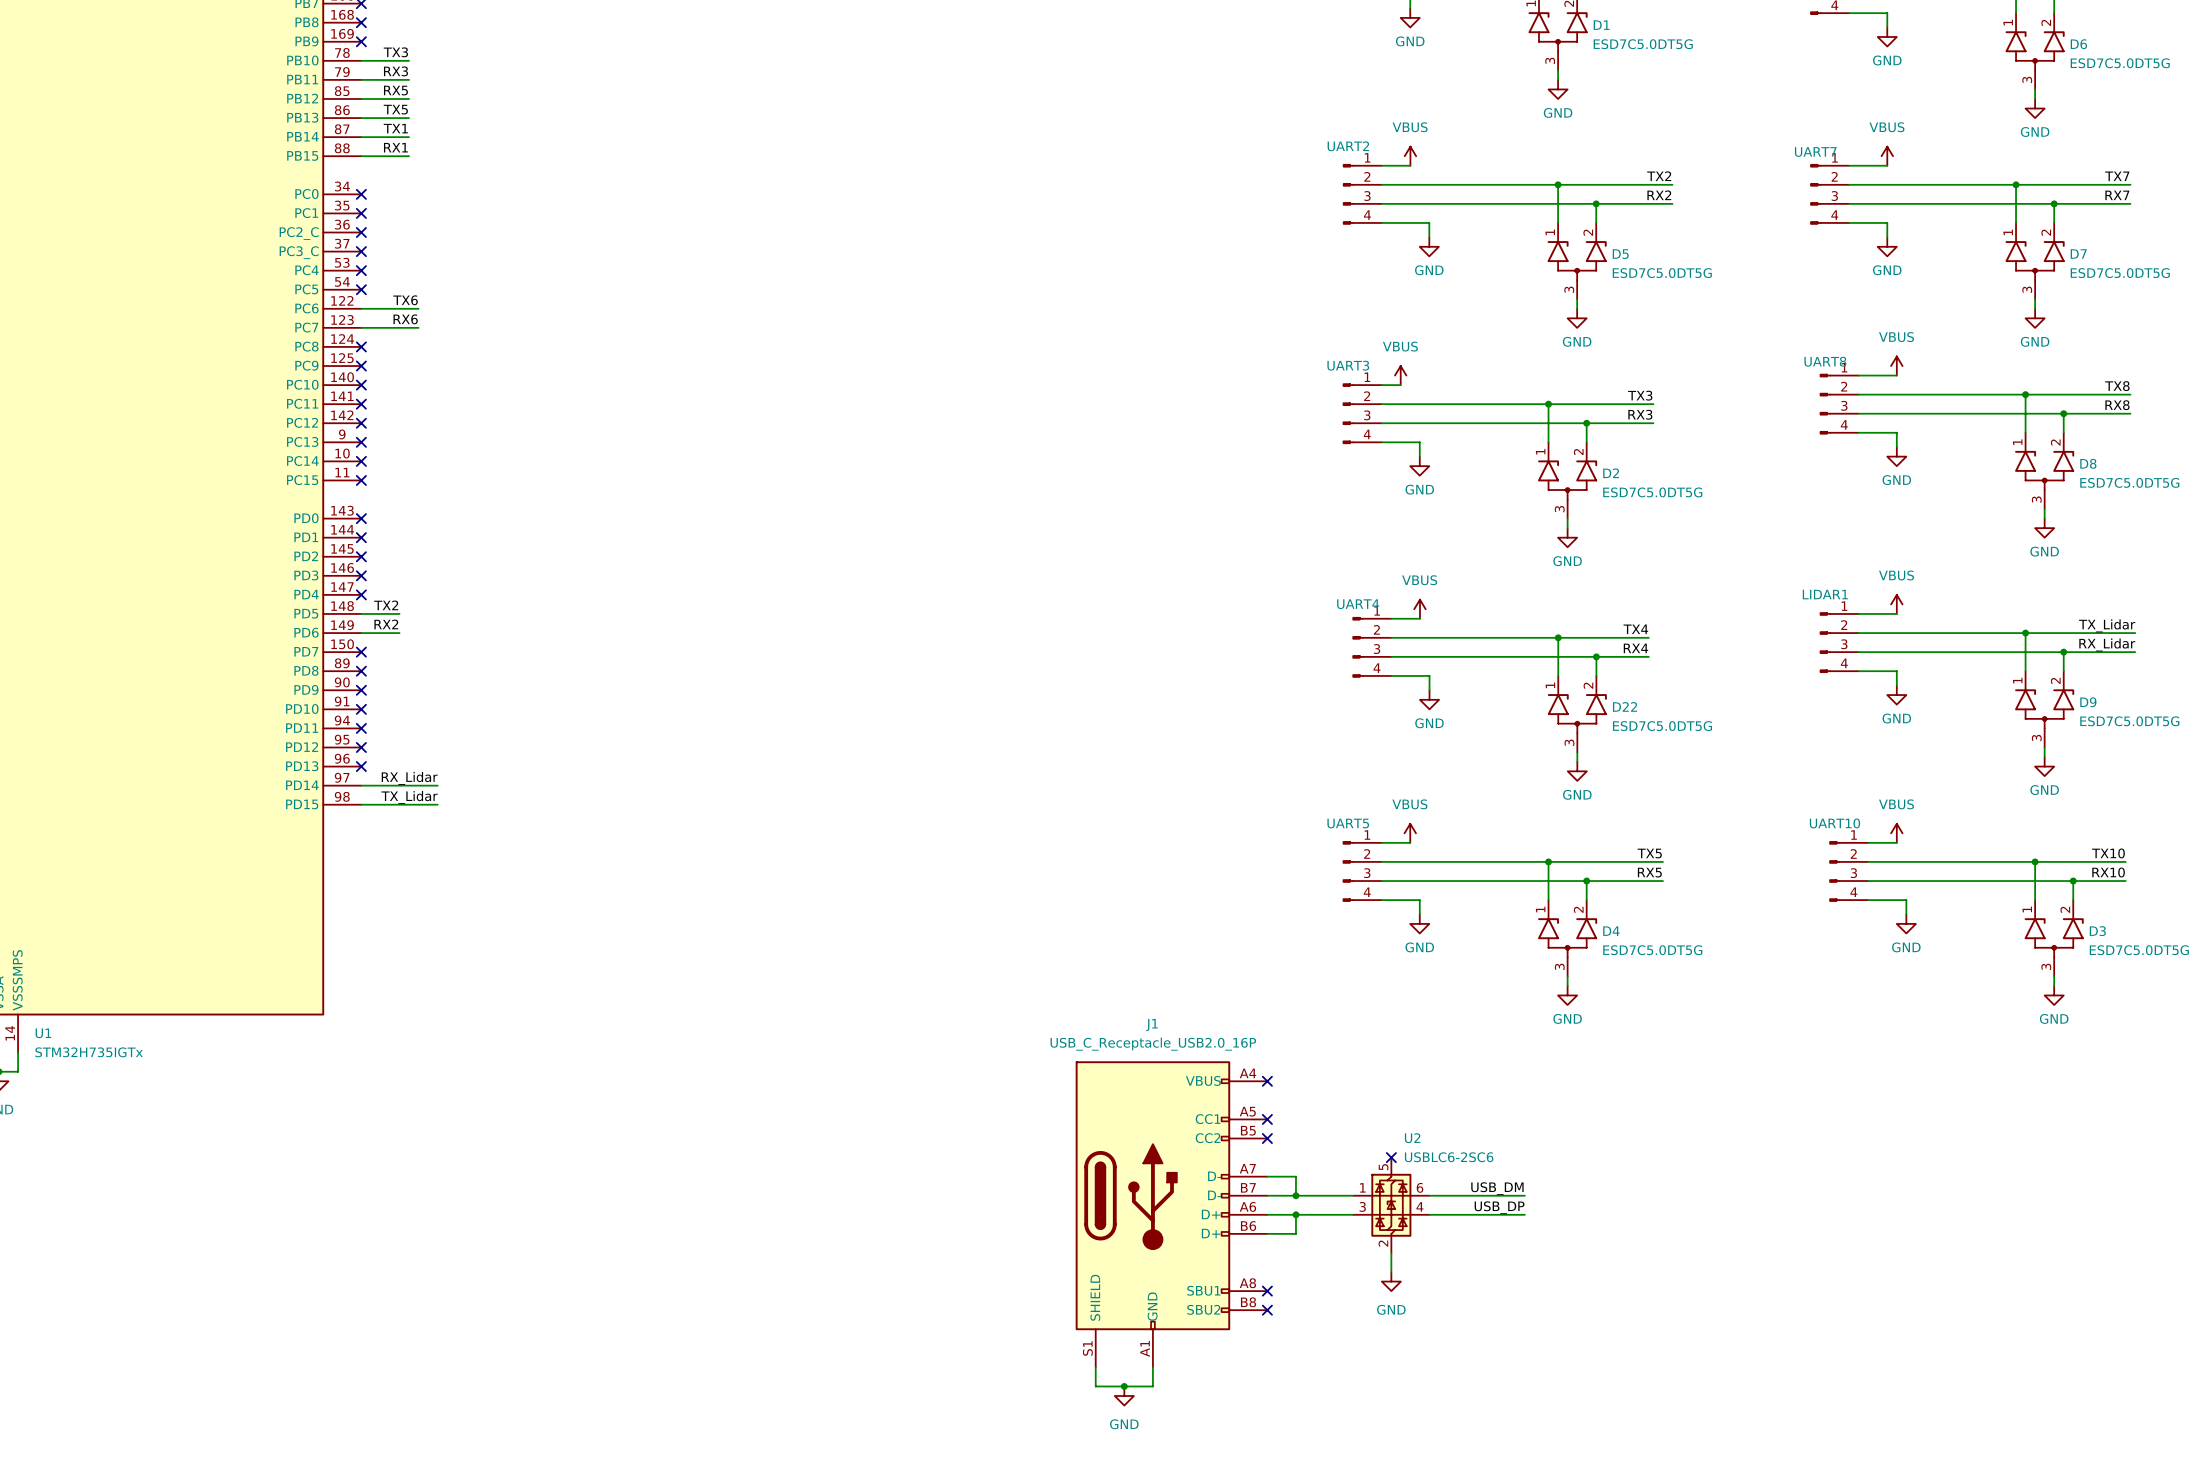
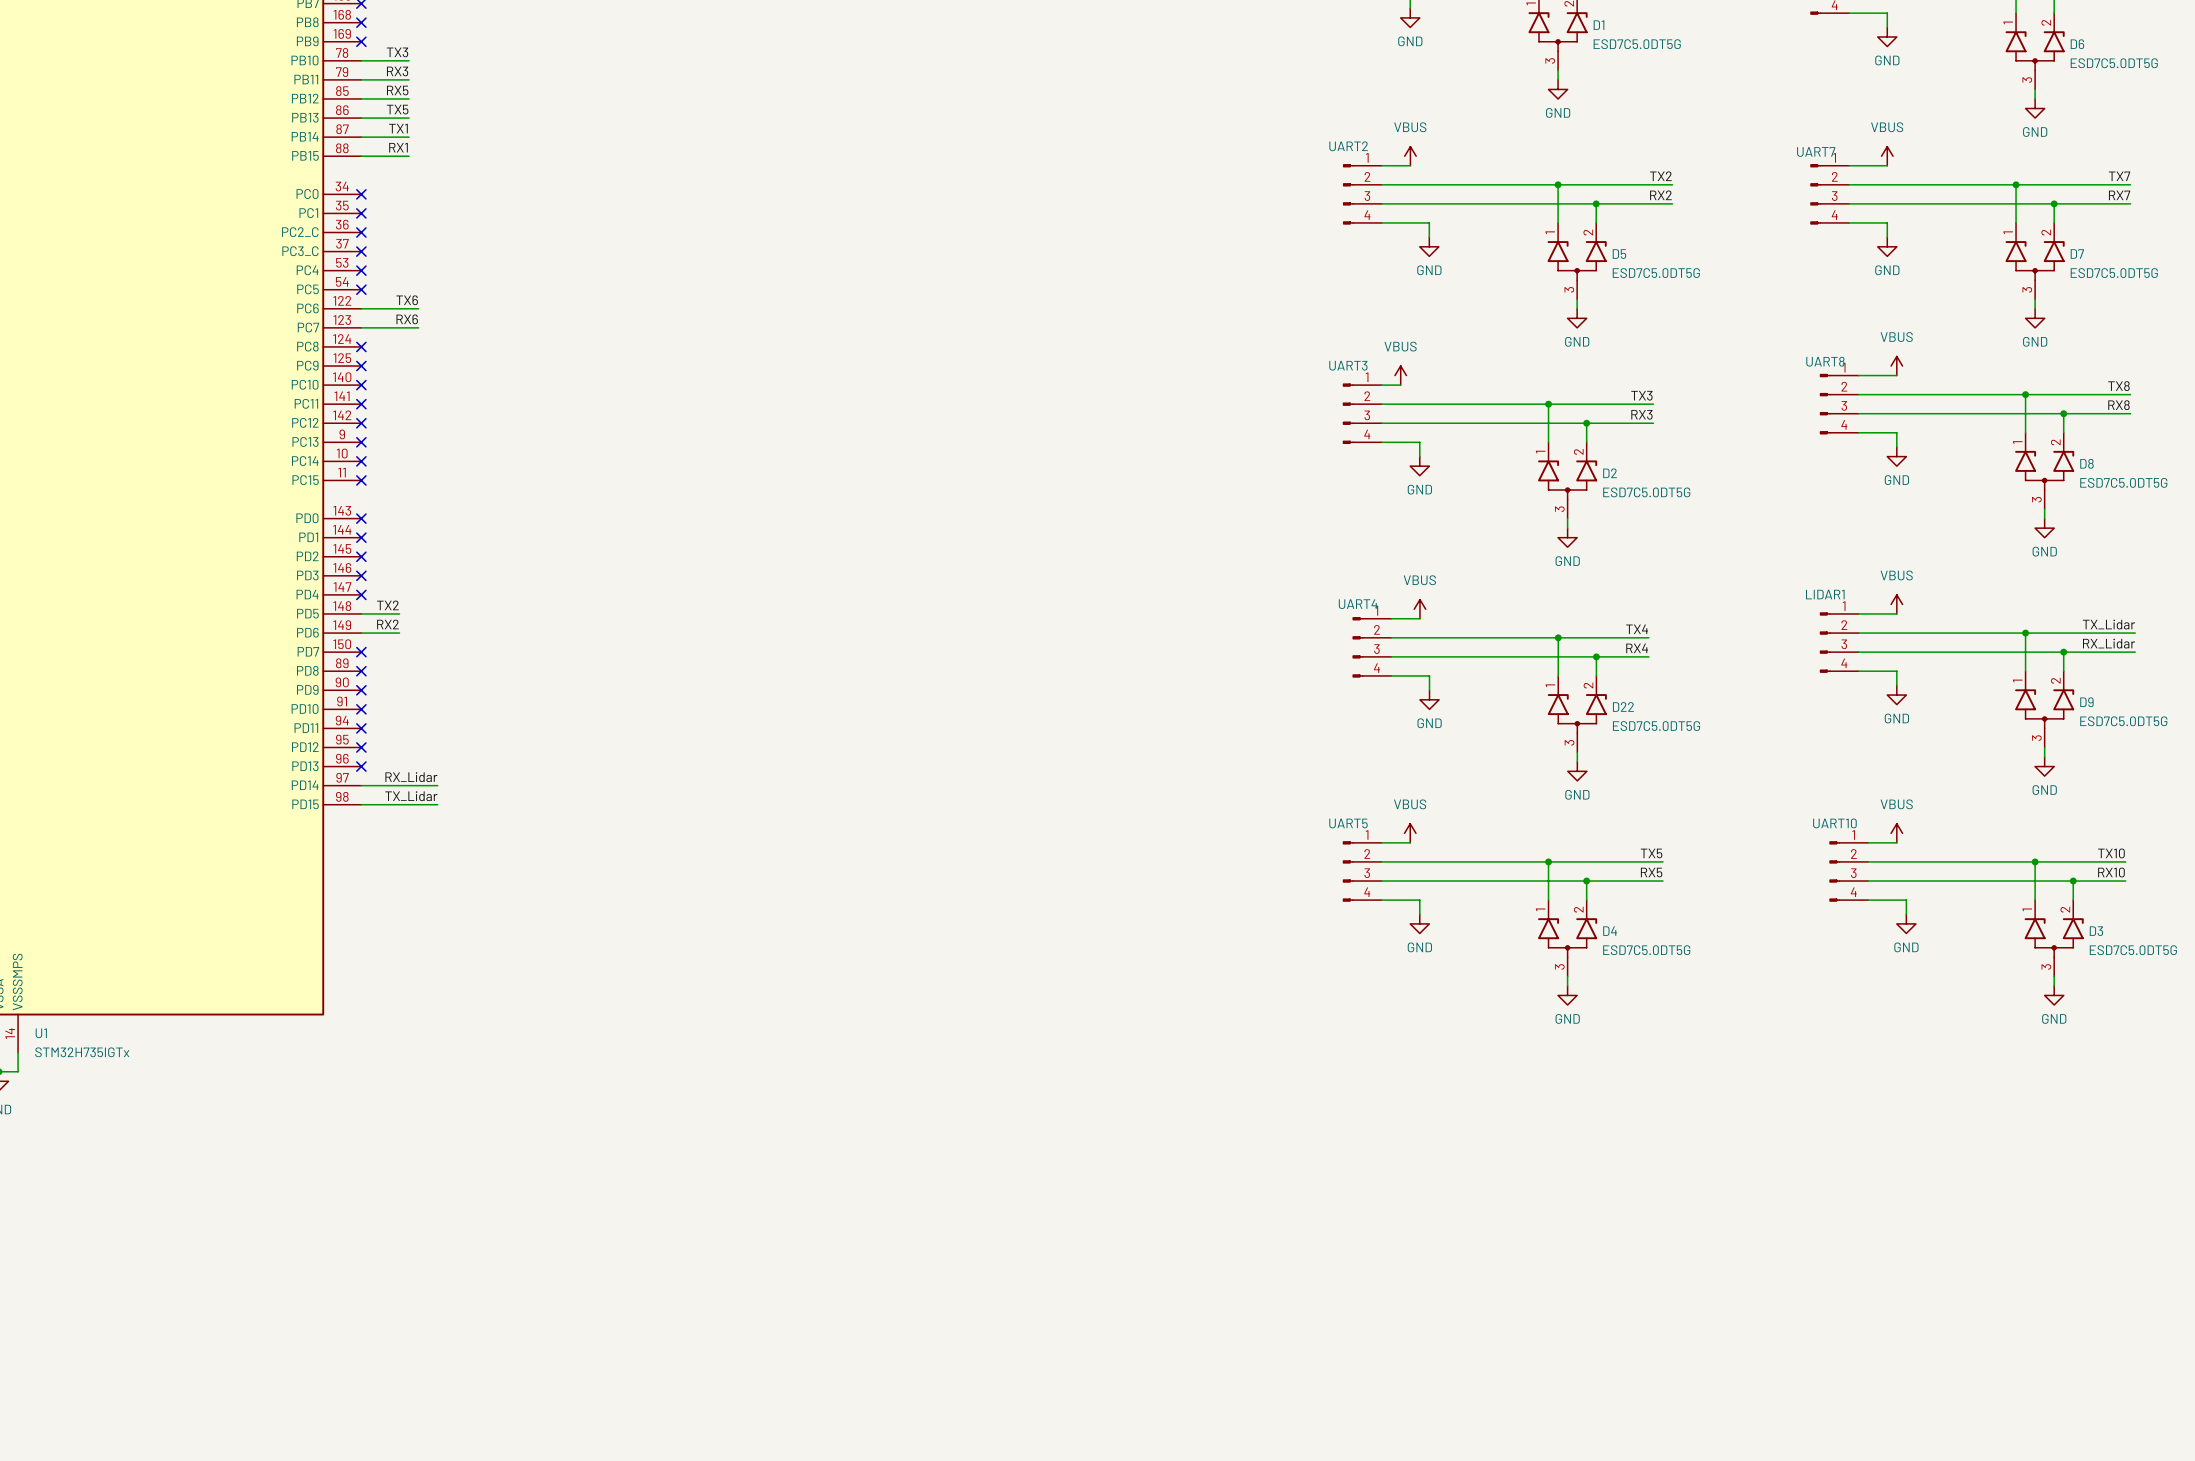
no-connect mark: (1267, 1081) -> none
no-connect mark: (1267, 1119) -> none
no-connect mark: (1267, 1138) -> none
no-connect mark: (1391, 1157) -> none
wire: (1267, 1176) (1295, 1176) (1295, 1195) -> none
label: USB_DM (1497, 1188) -> none
wire: (1267, 1195) (1353, 1195) -> none
junction: (1295, 1195) -> none
wire: (1429, 1195) (1524, 1195) -> none
U2: USBLC6-2SC6 (1391, 1205) -> none
label: USB_DP (1499, 1207) -> none
J1: USB_C_Receptacle_USB2.0_16P (1171, 1214) -> none
wire: (1267, 1214) (1353, 1214) -> none
wire: (1295, 1214) (1295, 1233) (1267, 1233) -> none
junction: (1295, 1214) -> none
wire: (1429, 1214) (1524, 1214) -> none
wire: (1391, 1252) (1391, 1272) -> none
power symbol: GND (1391, 1281) -> none
no-connect mark: (1267, 1291) -> none
no-connect mark: (1267, 1310) -> none
wire: (1095, 1367) (1095, 1386) (1152, 1386) (1152, 1367) -> none
junction: (1124, 1386) -> none
power symbol: GND (1124, 1396) -> none

